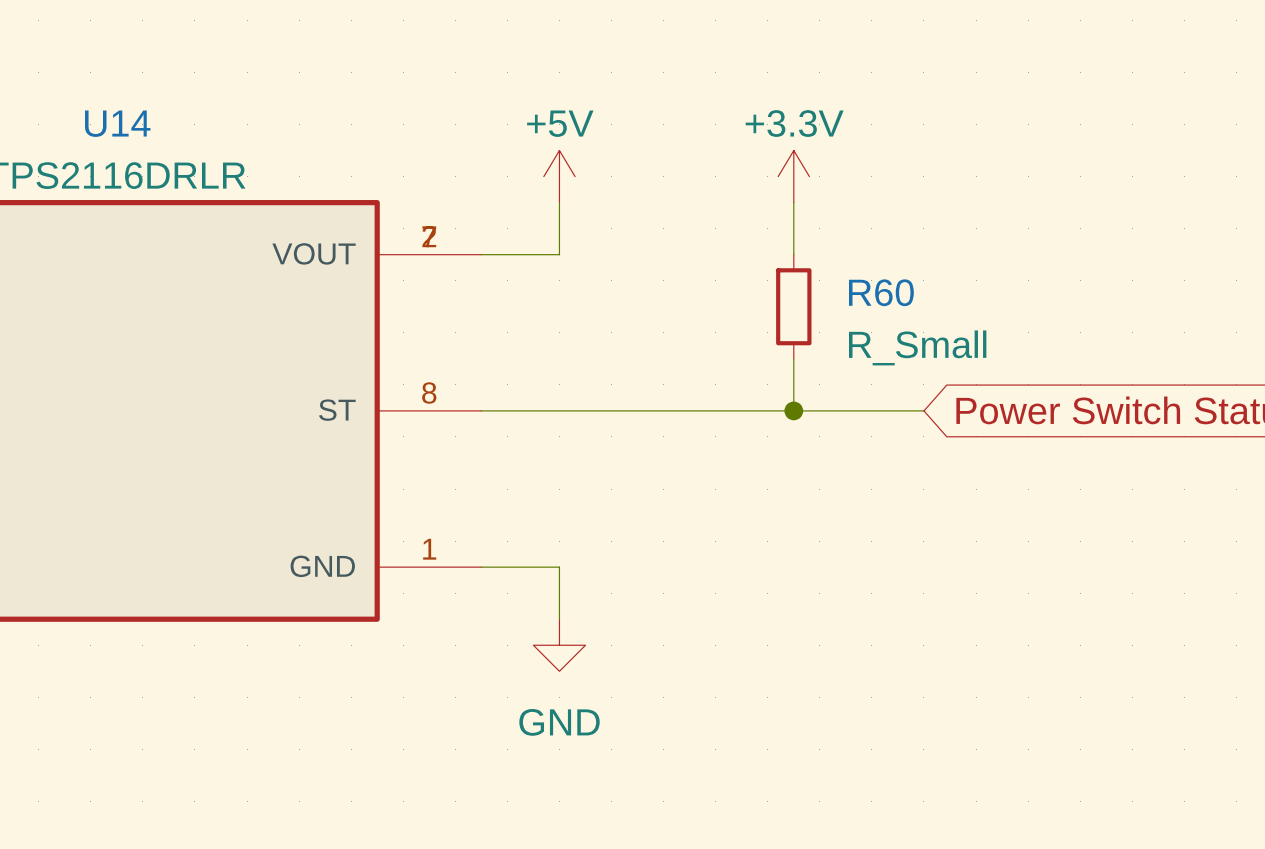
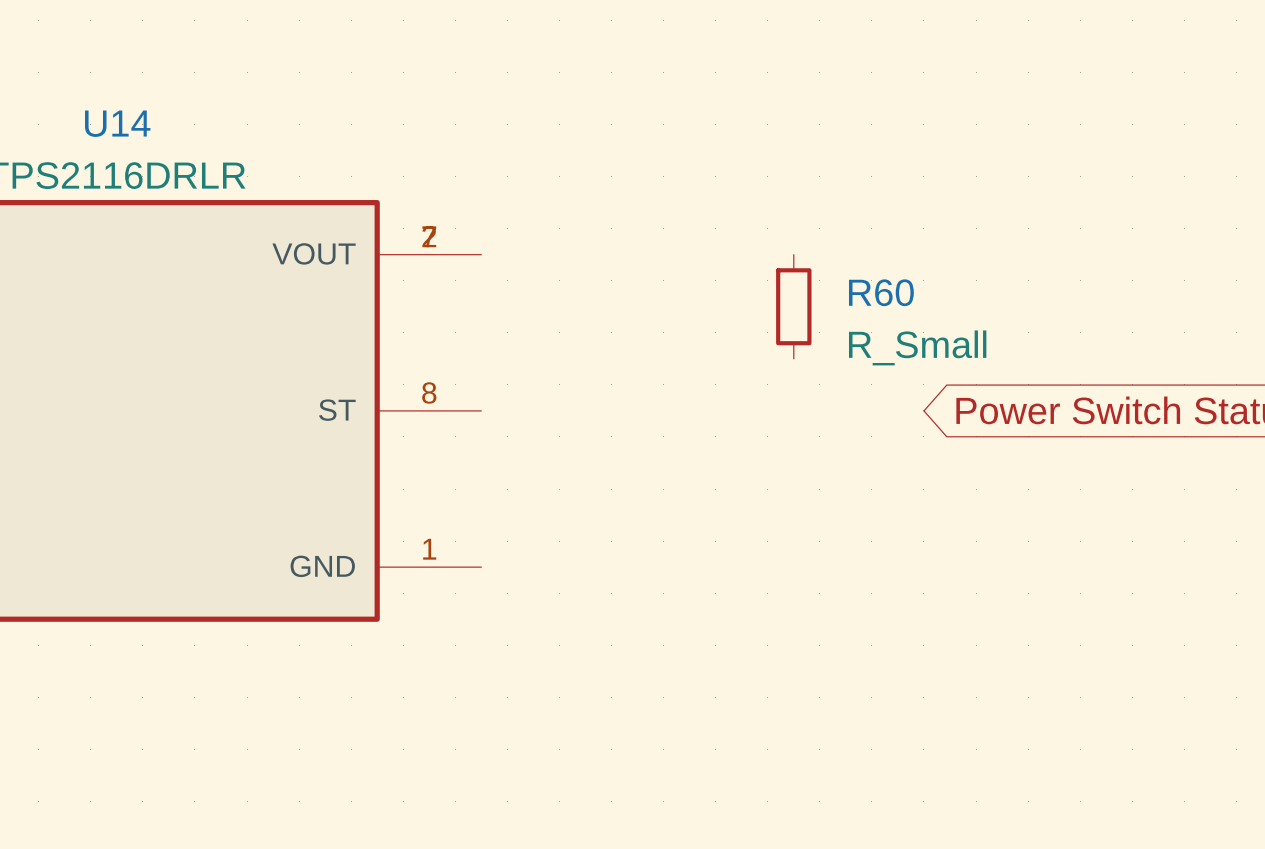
power symbol: +5V (559, 176) -> none
power symbol: +3.3V (793, 176) -> none
wire: (559, 202) (559, 254) (481, 254) -> none
wire: (793, 202) (793, 254) -> none
wire: (793, 358) (793, 410) -> none
wire: (481, 410) (923, 410) -> none
junction: (793, 410) -> none
wire: (481, 567) (559, 567) (559, 619) -> none
power symbol: GND (559, 645) -> none

